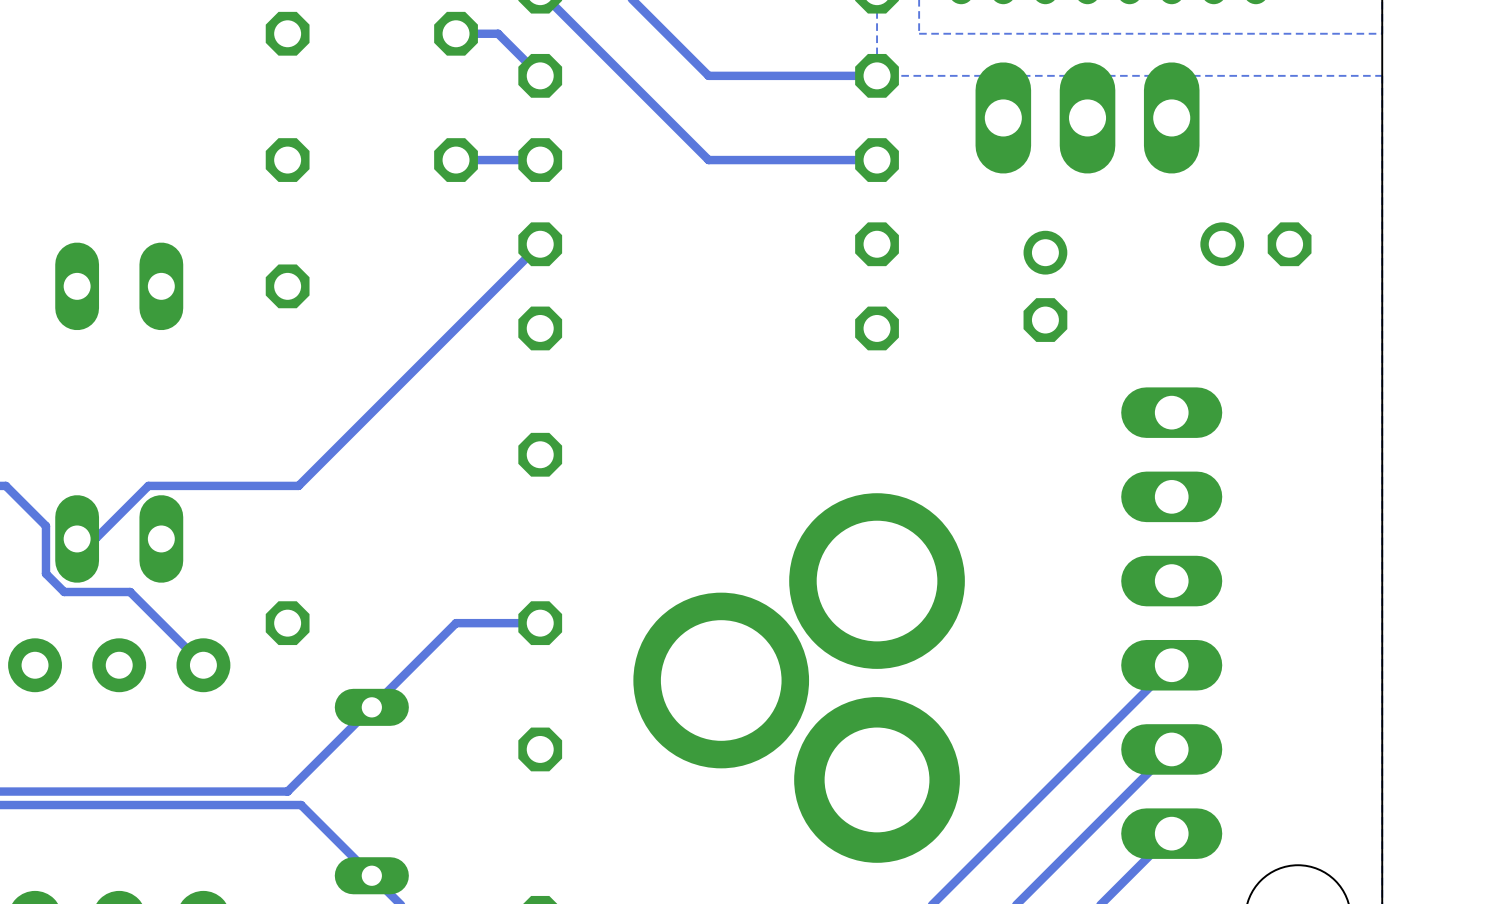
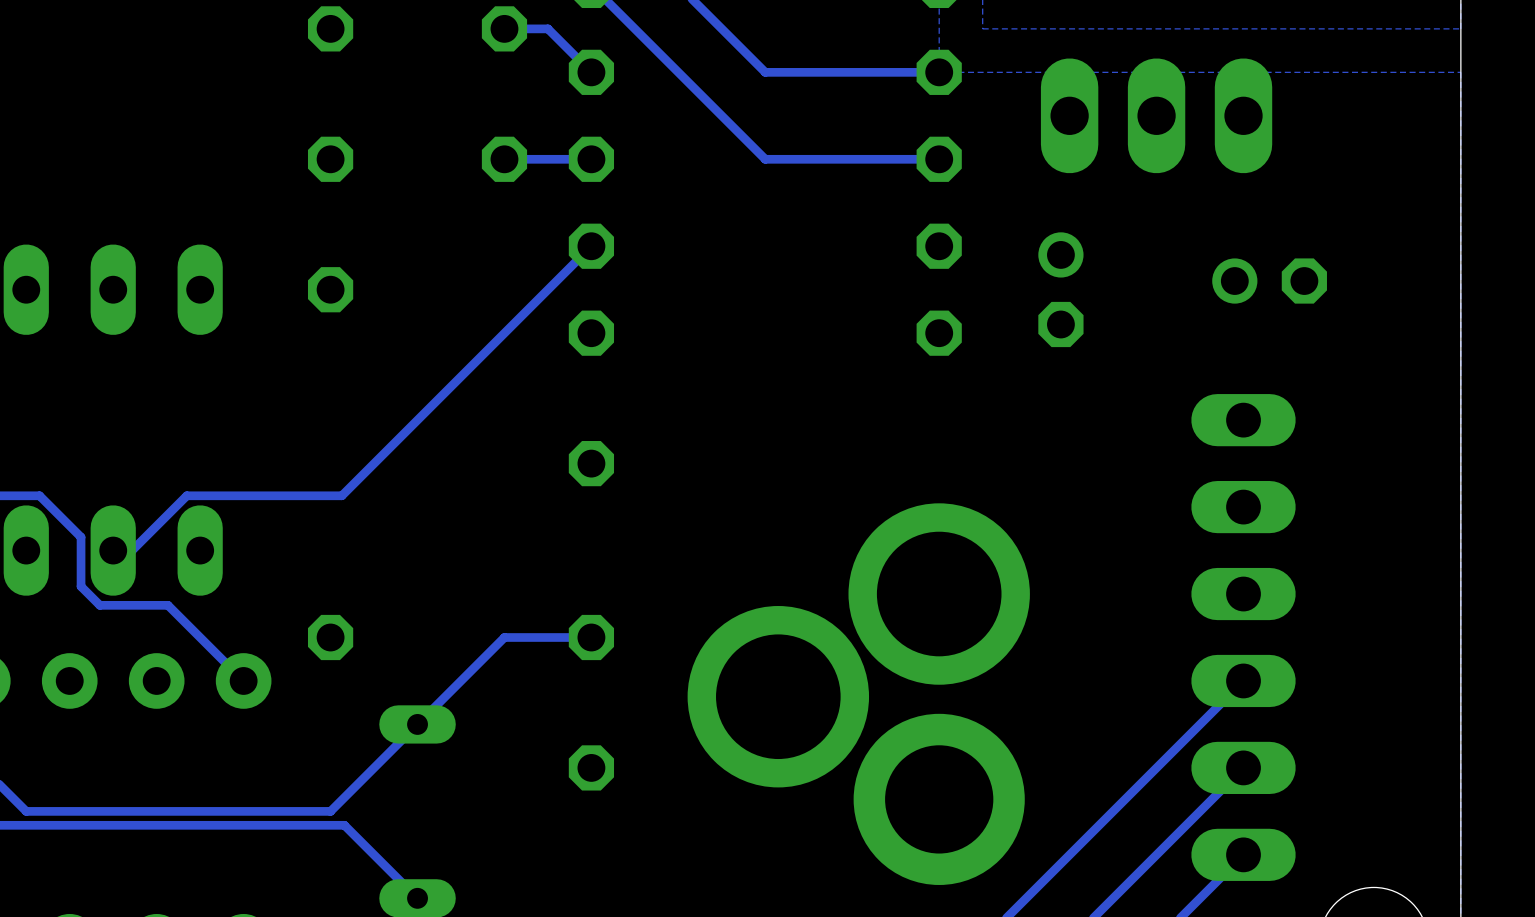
part position: (1255, 244) -> (1269, 281)
part position: (1045, 286) -> (1060, 289)

